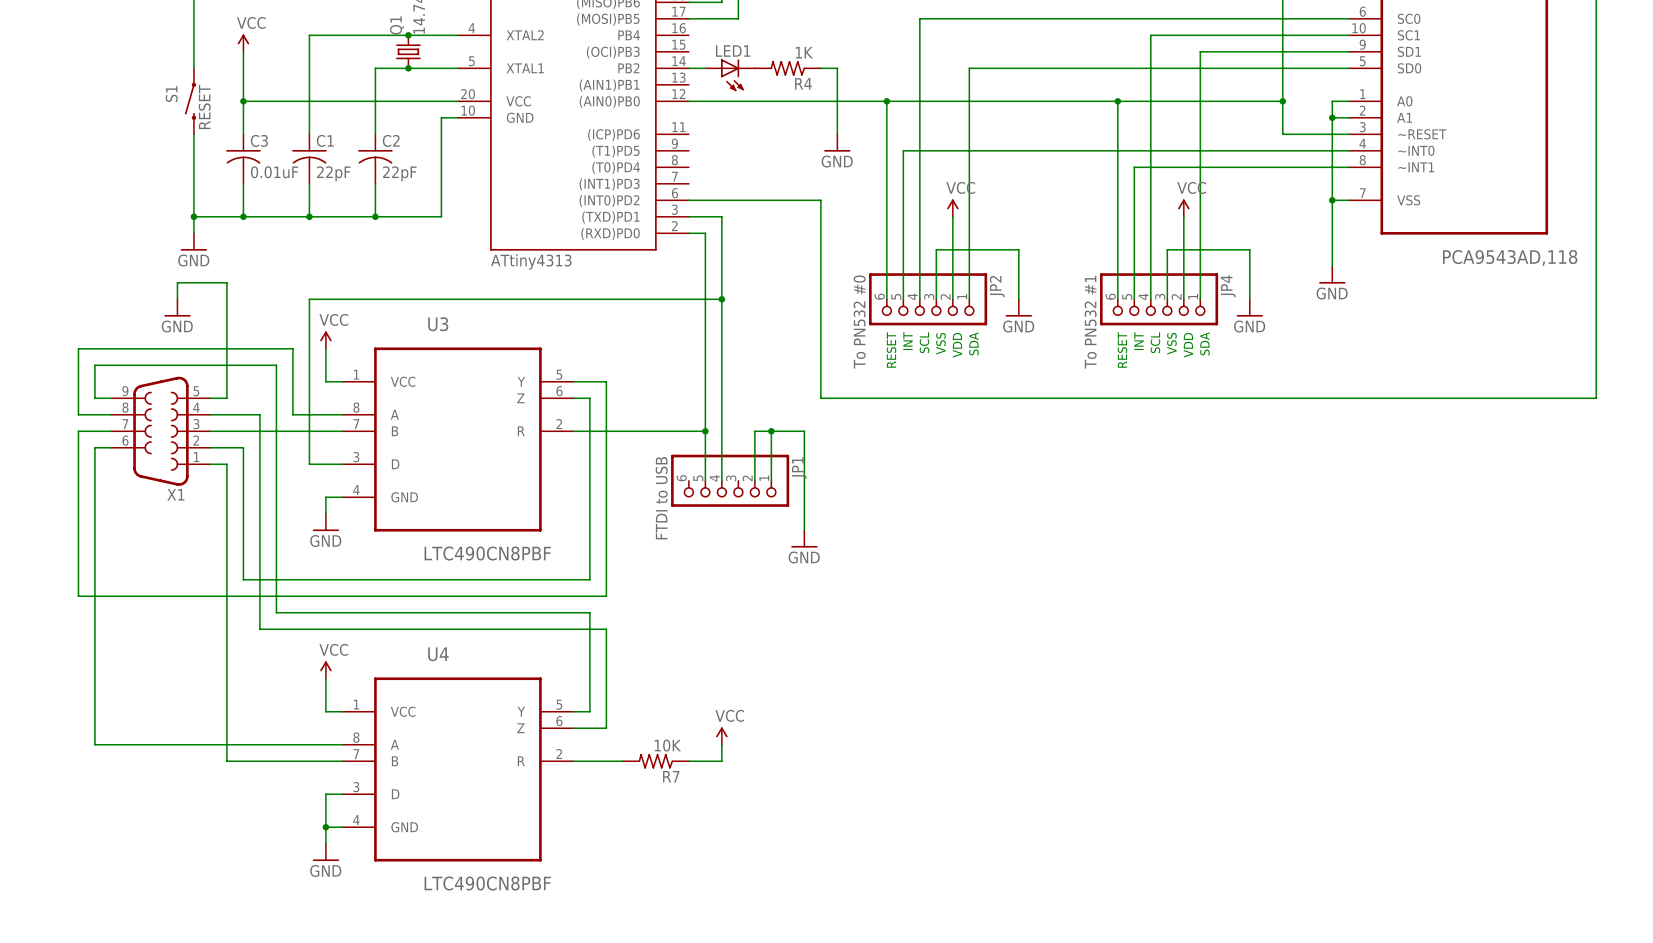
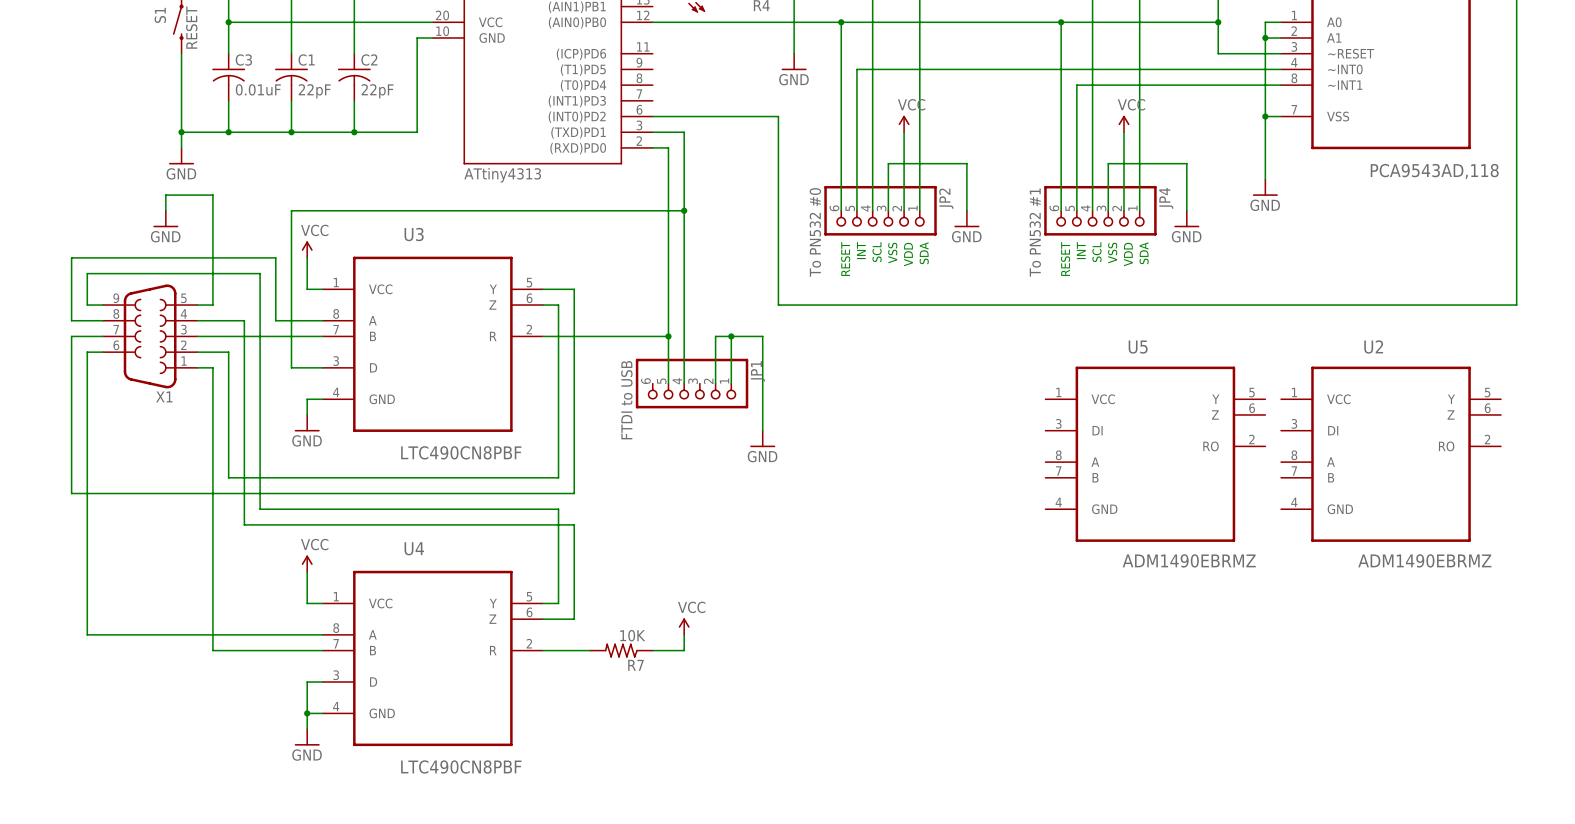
U5: none -> ADM1490EBRMZ (1155, 454)
U2: none -> ADM1490EBRMZ (1391, 454)

